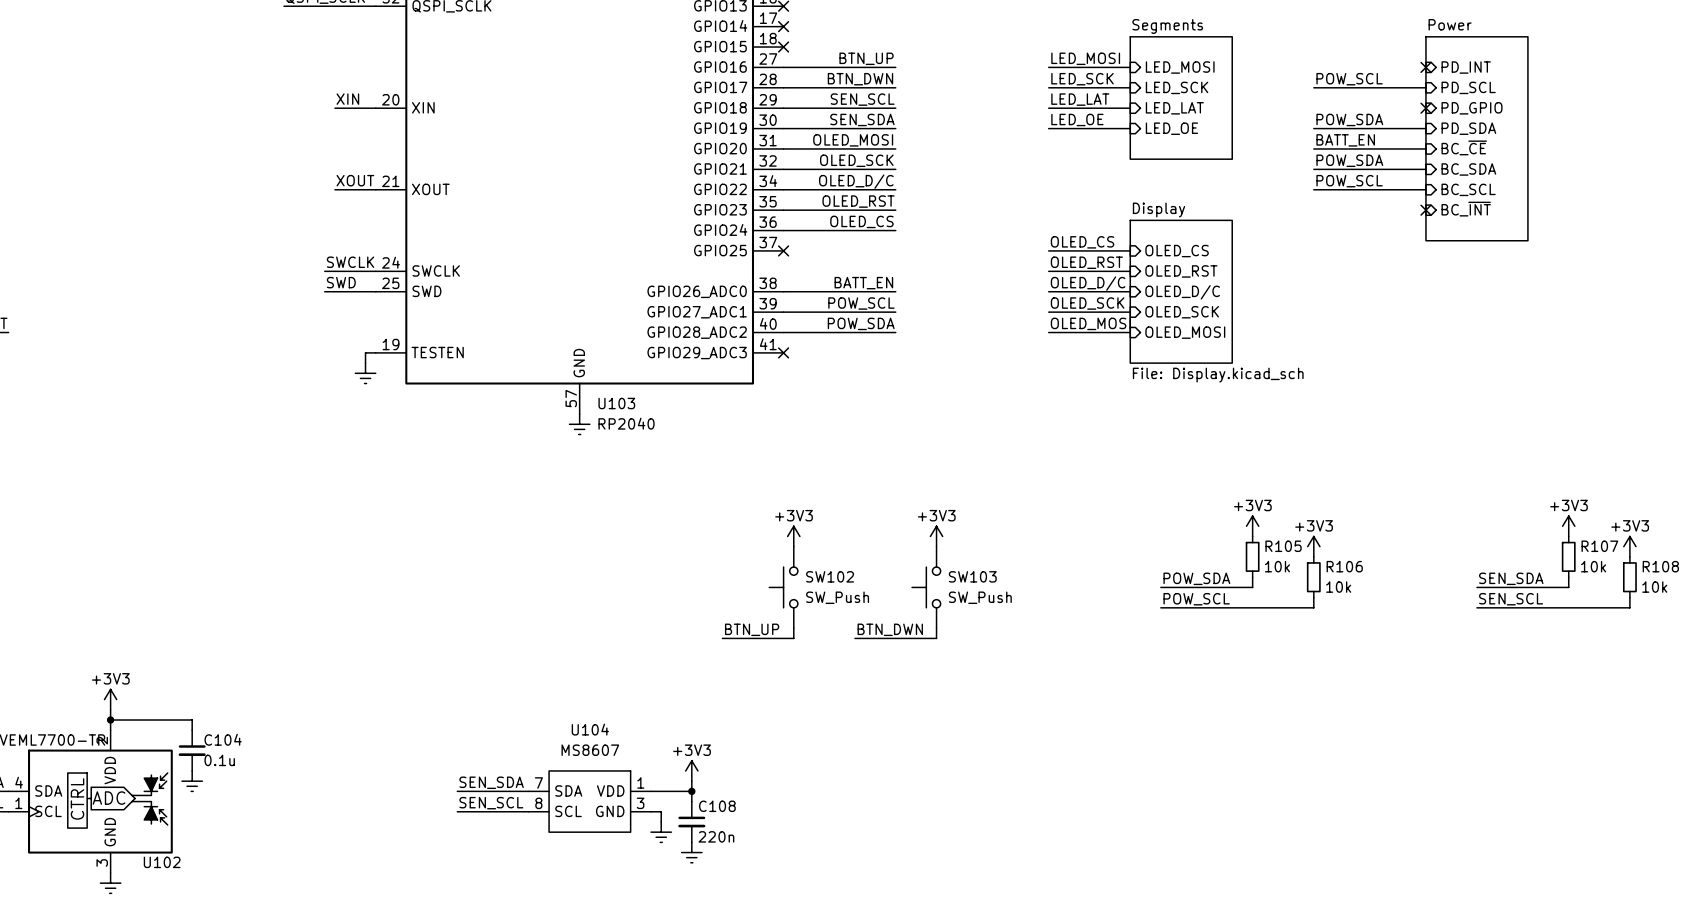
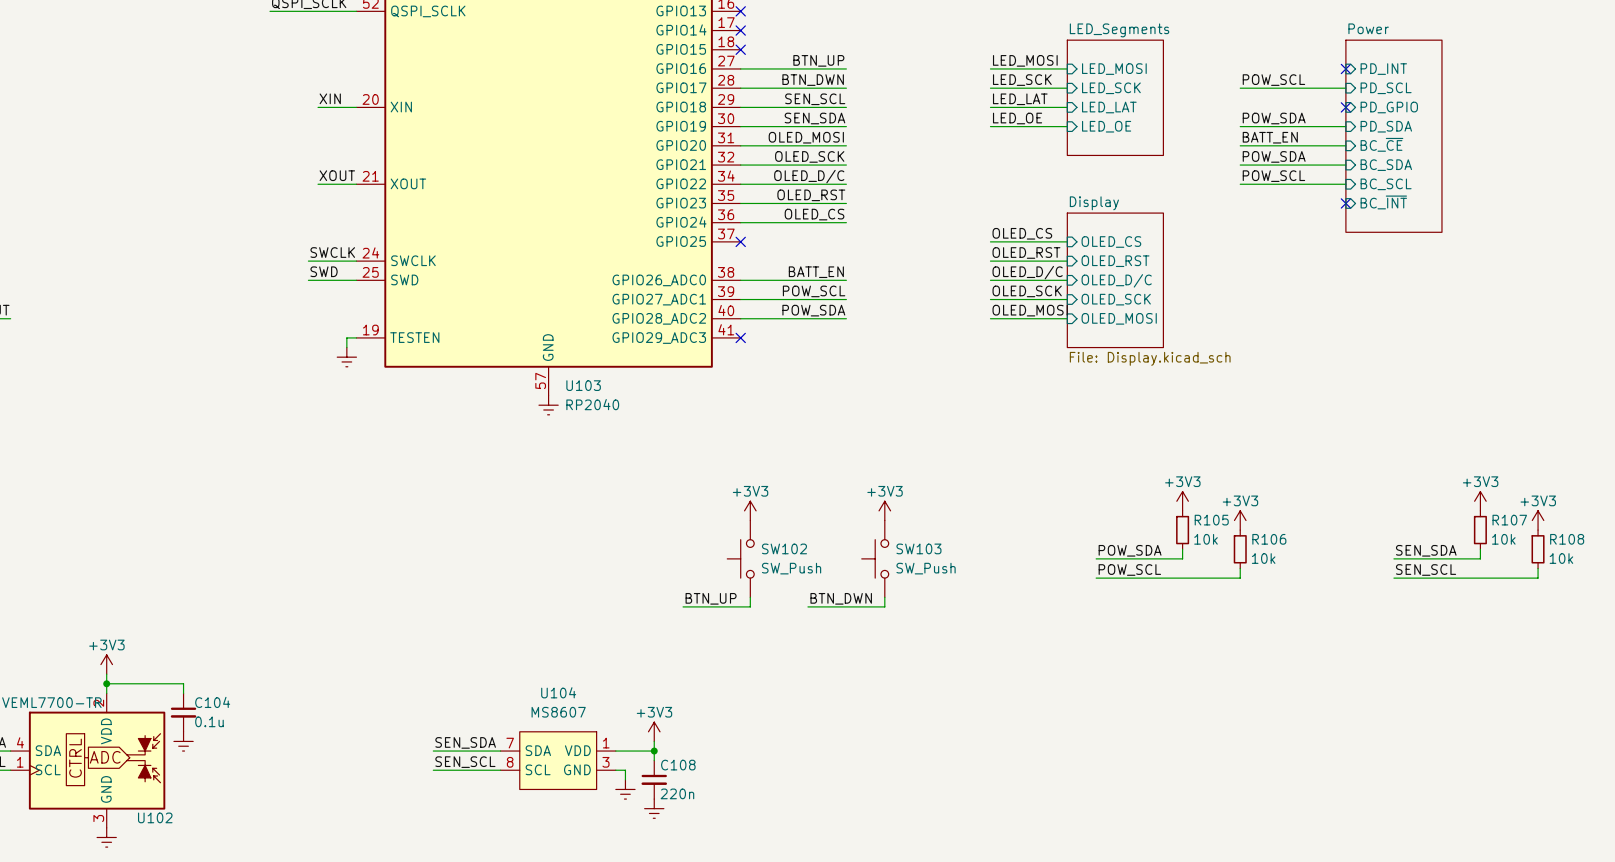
sheet Segments name: Segments (1167, 26) -> LED_Segments (1119, 30)

